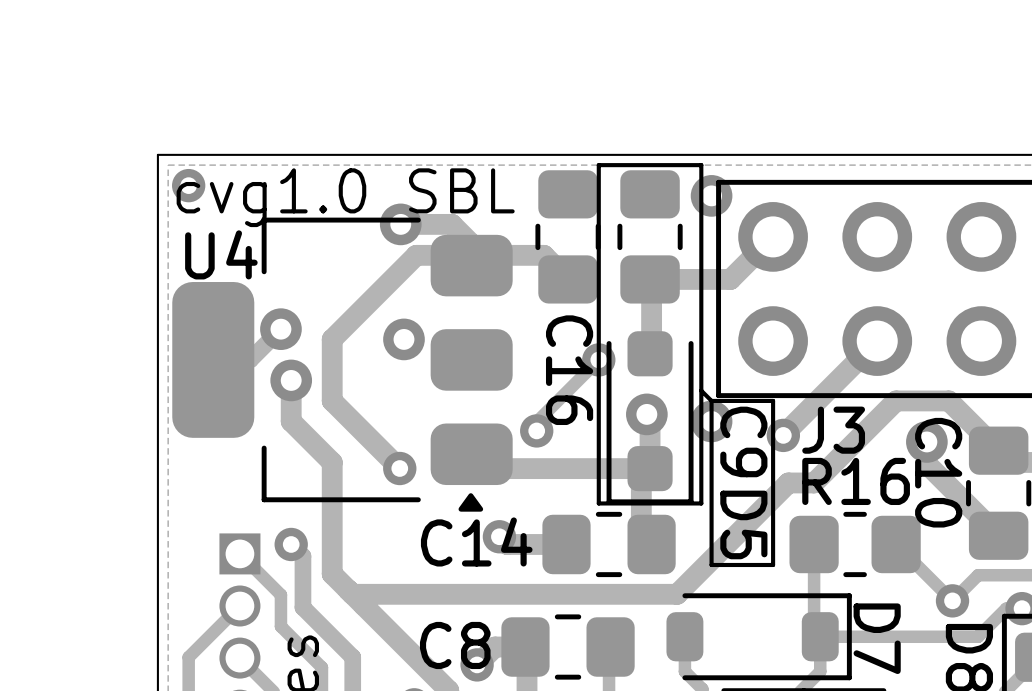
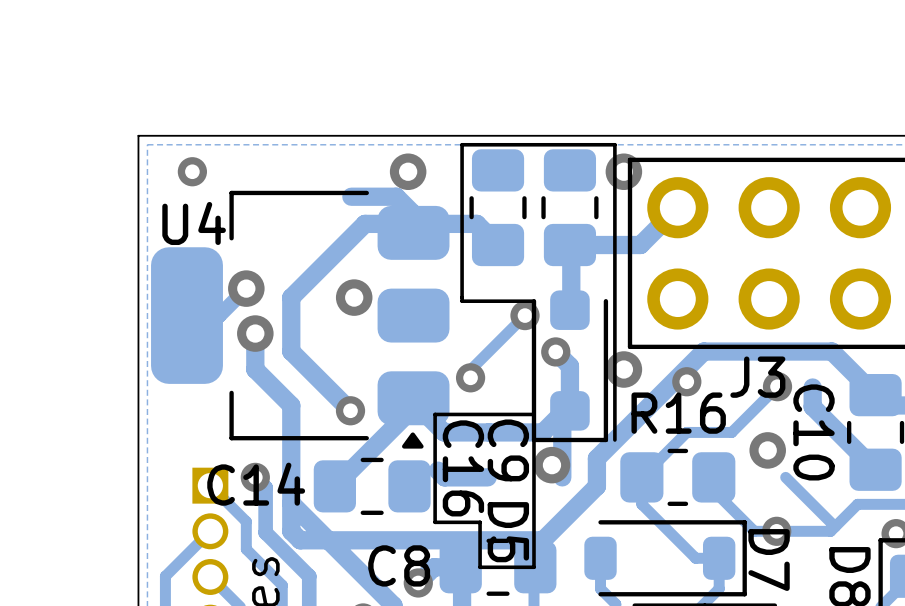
line: (598, 165) (598, 503) (701, 503) (701, 501) -> (525, 144) (462, 144) (462, 301) (533, 301)
via position: (188, 185) -> (192, 171)
text: cvg1.0 SBL (345, 197) -> none
via position: (400, 224) -> (408, 171)
track: (877, 341) (786, 431) (783, 431) (783, 435) -> none
C16 name position: C16 (569, 370) -> C16 (463, 468)
line: (701, 390) (711, 400) -> none
line: (711, 400) (773, 400) (773, 564) (711, 564) (711, 400) -> none
track: (896, 400) (814, 482) (788, 482) (677, 594) (352, 594) -> (785, 351) (703, 351) (596, 458) (596, 486) (542, 540) (300, 540) (291, 531) (291, 503)
via: none -> (555, 351)
via position: (646, 414) -> (551, 465)
J3 name position: J3 (833, 430) -> J3 (757, 377)
C9 name position: C9 (743, 441) -> C9 (508, 450)
track: none -> (777, 386) (731, 432) (686, 432) (641, 477) (641, 504) (695, 558) (719, 558)
via: none -> (777, 386)
via position: (926, 441) -> (767, 450)
track: none -> (413, 407) (334, 486)
track: (643, 468) (481, 468) -> (564, 410) (542, 432) (444, 432) (422, 410)
line: none -> (533, 414) (435, 414) (435, 522) (480, 522) (480, 567) (533, 567) (533, 432)
C10 name position: C10 (938, 472) -> C10 (814, 432)
R16 name position: R16 (856, 481) -> R16 (678, 413)
D5 name position: D5 (743, 524) -> D5 (508, 532)
via: (499, 536) -> none
C14 position: (609, 544) -> (372, 486)
R16 position: (855, 544) -> (677, 477)
track: (814, 559) (814, 630) (820, 636) (978, 636) (1006, 608) (1022, 608) -> (713, 490) (754, 531) (830, 531) (835, 526)
via position: (952, 600) -> (776, 531)

